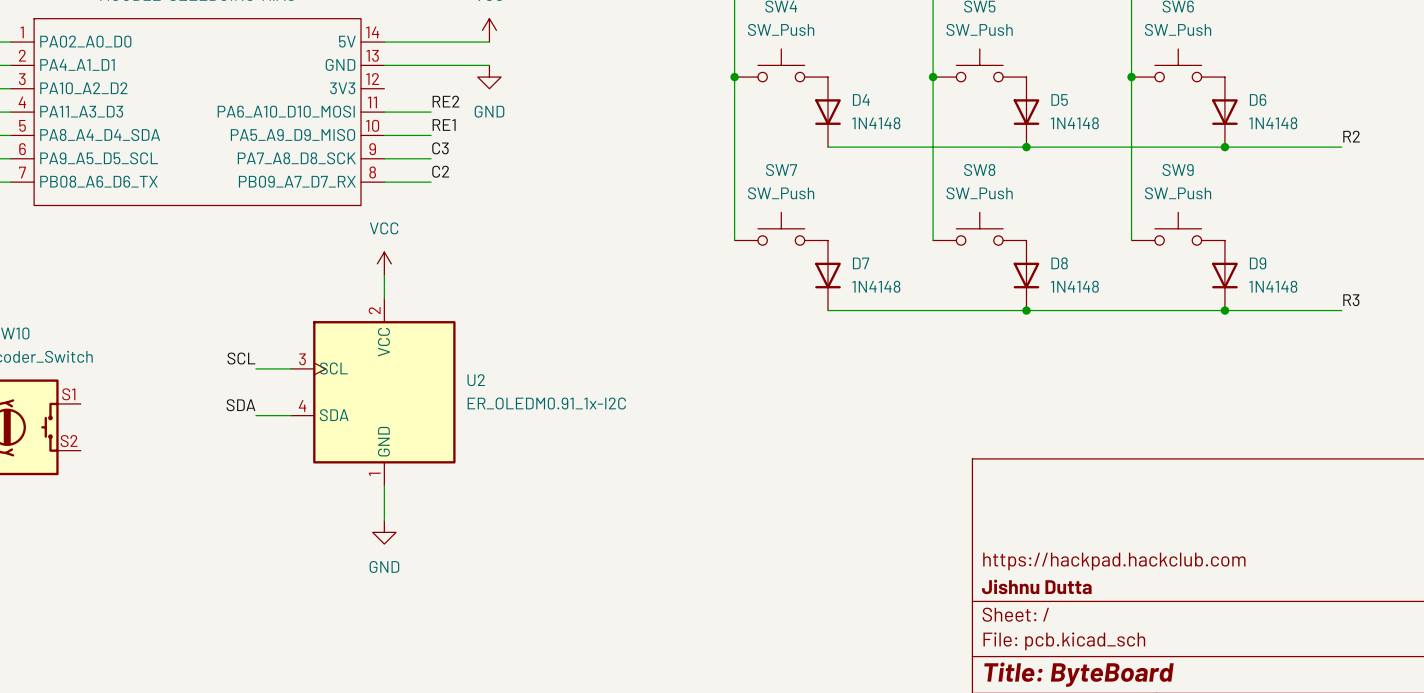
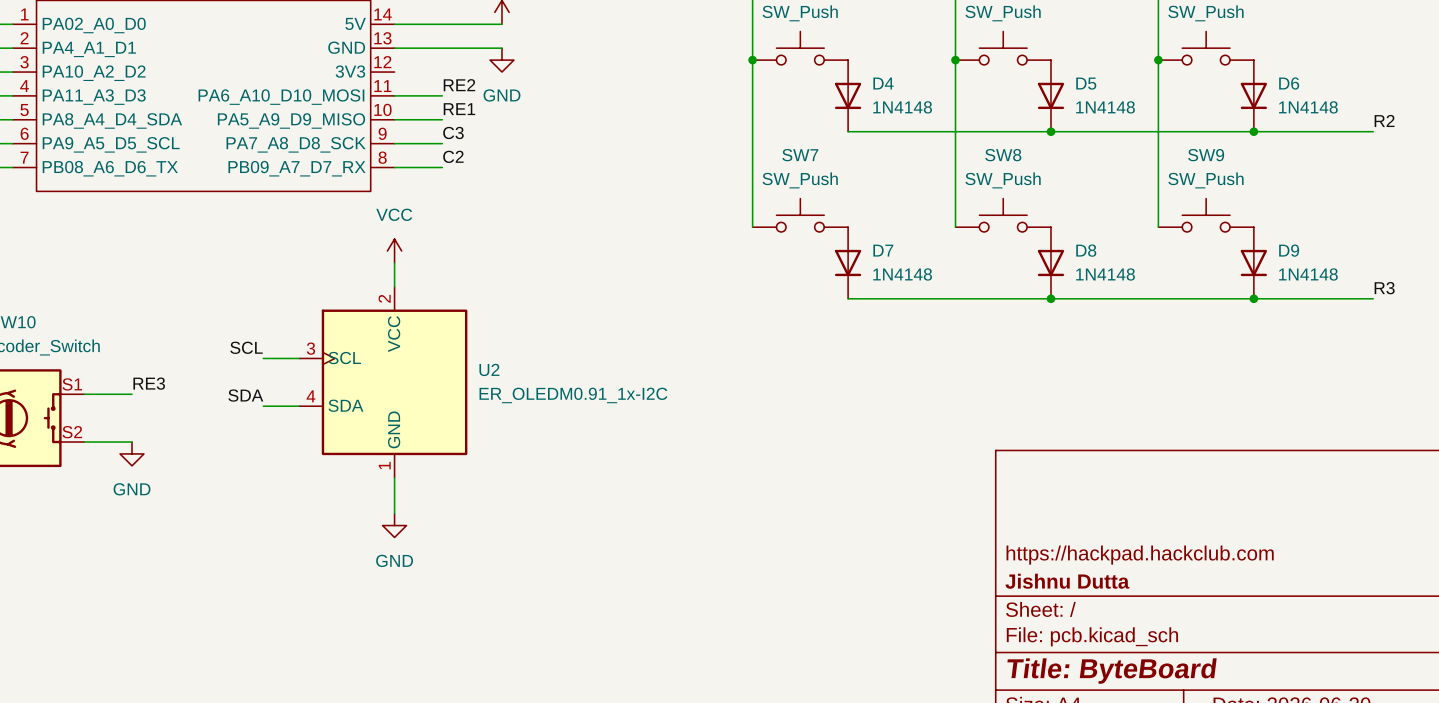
label: none -> RE3 (149, 383)
wire: none -> (84, 394) (132, 394)
wire: none -> (84, 442) (132, 442)
power symbol: none -> GND (132, 453)

